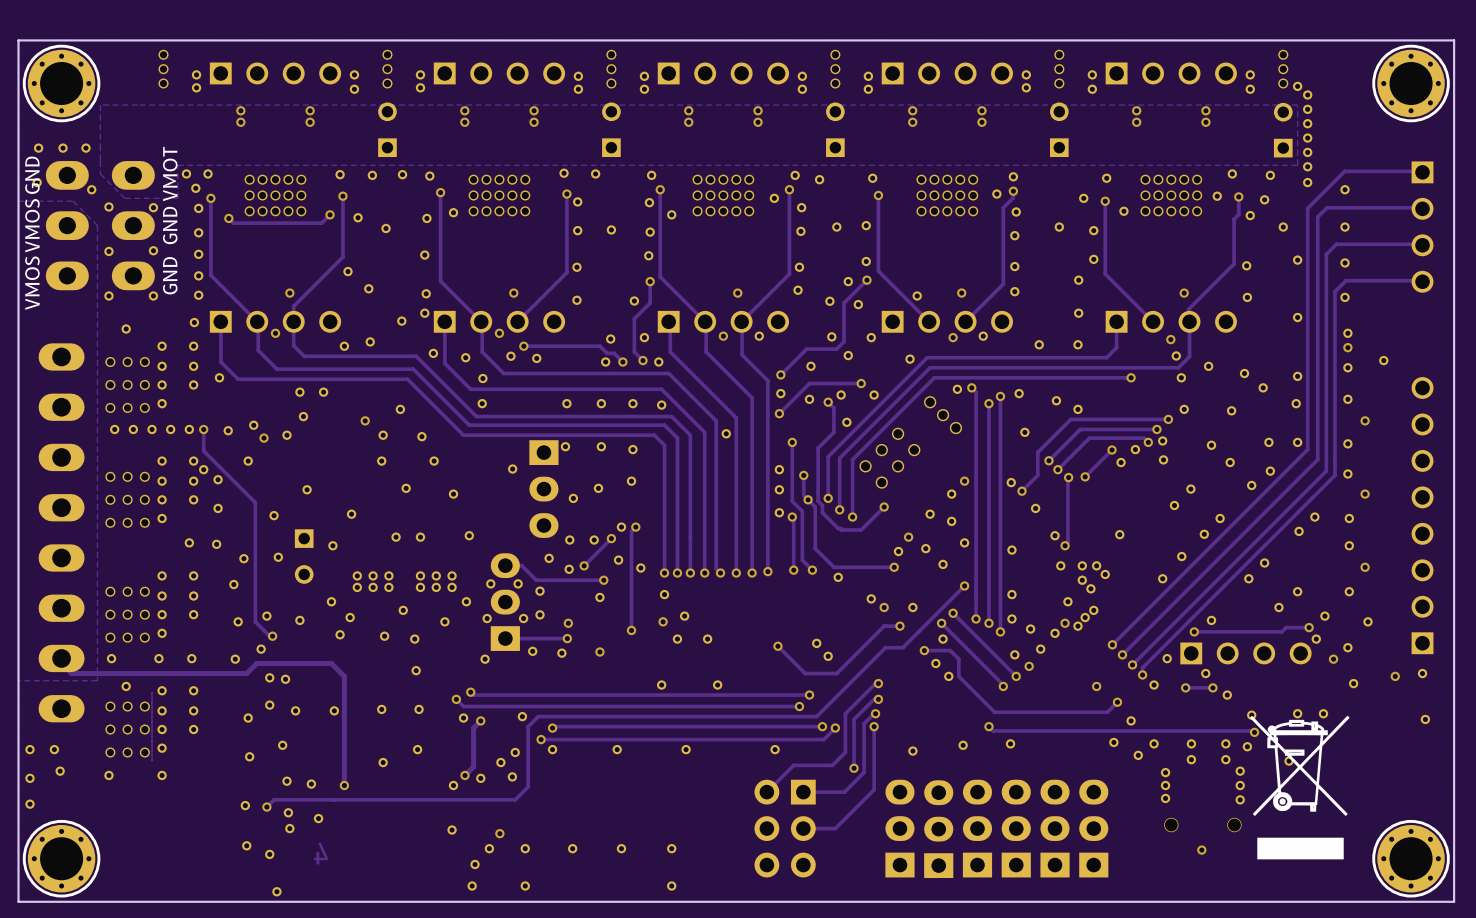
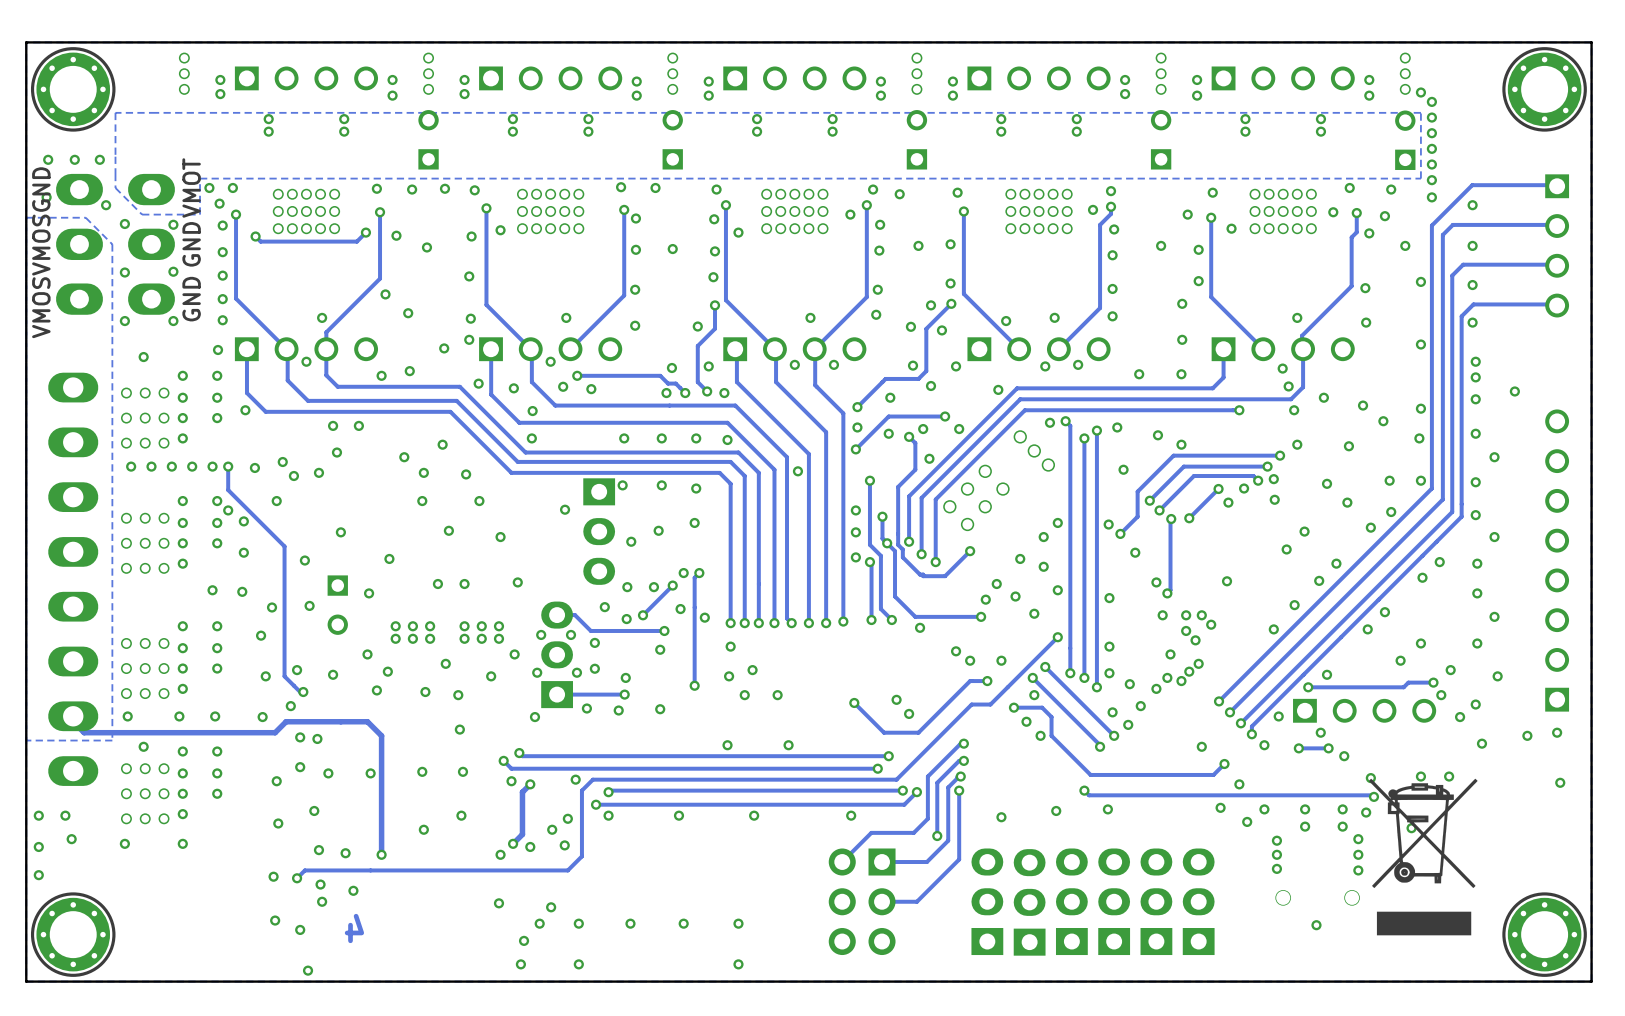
zone outline: (152, 692) (152, 761) -> none

